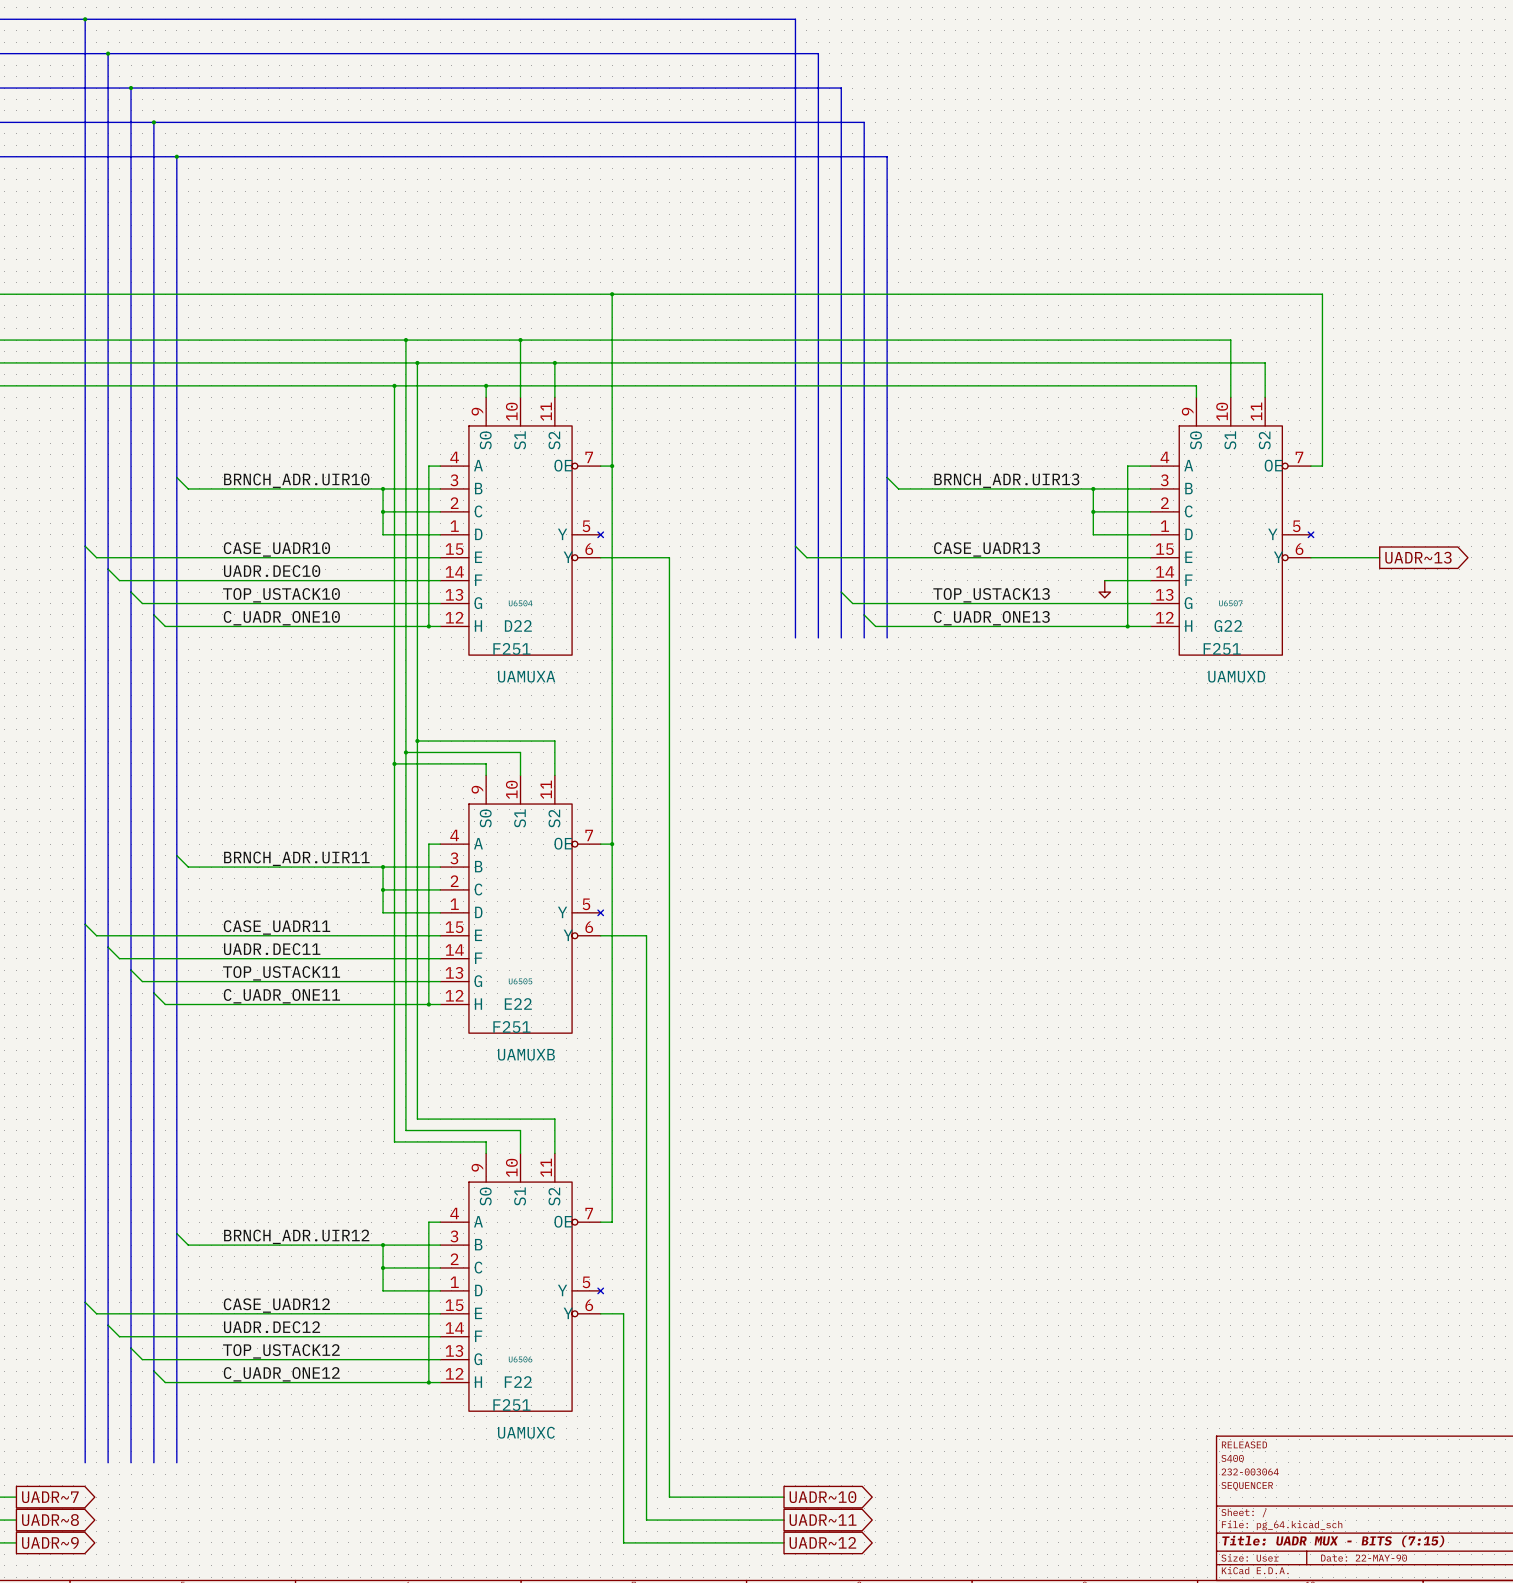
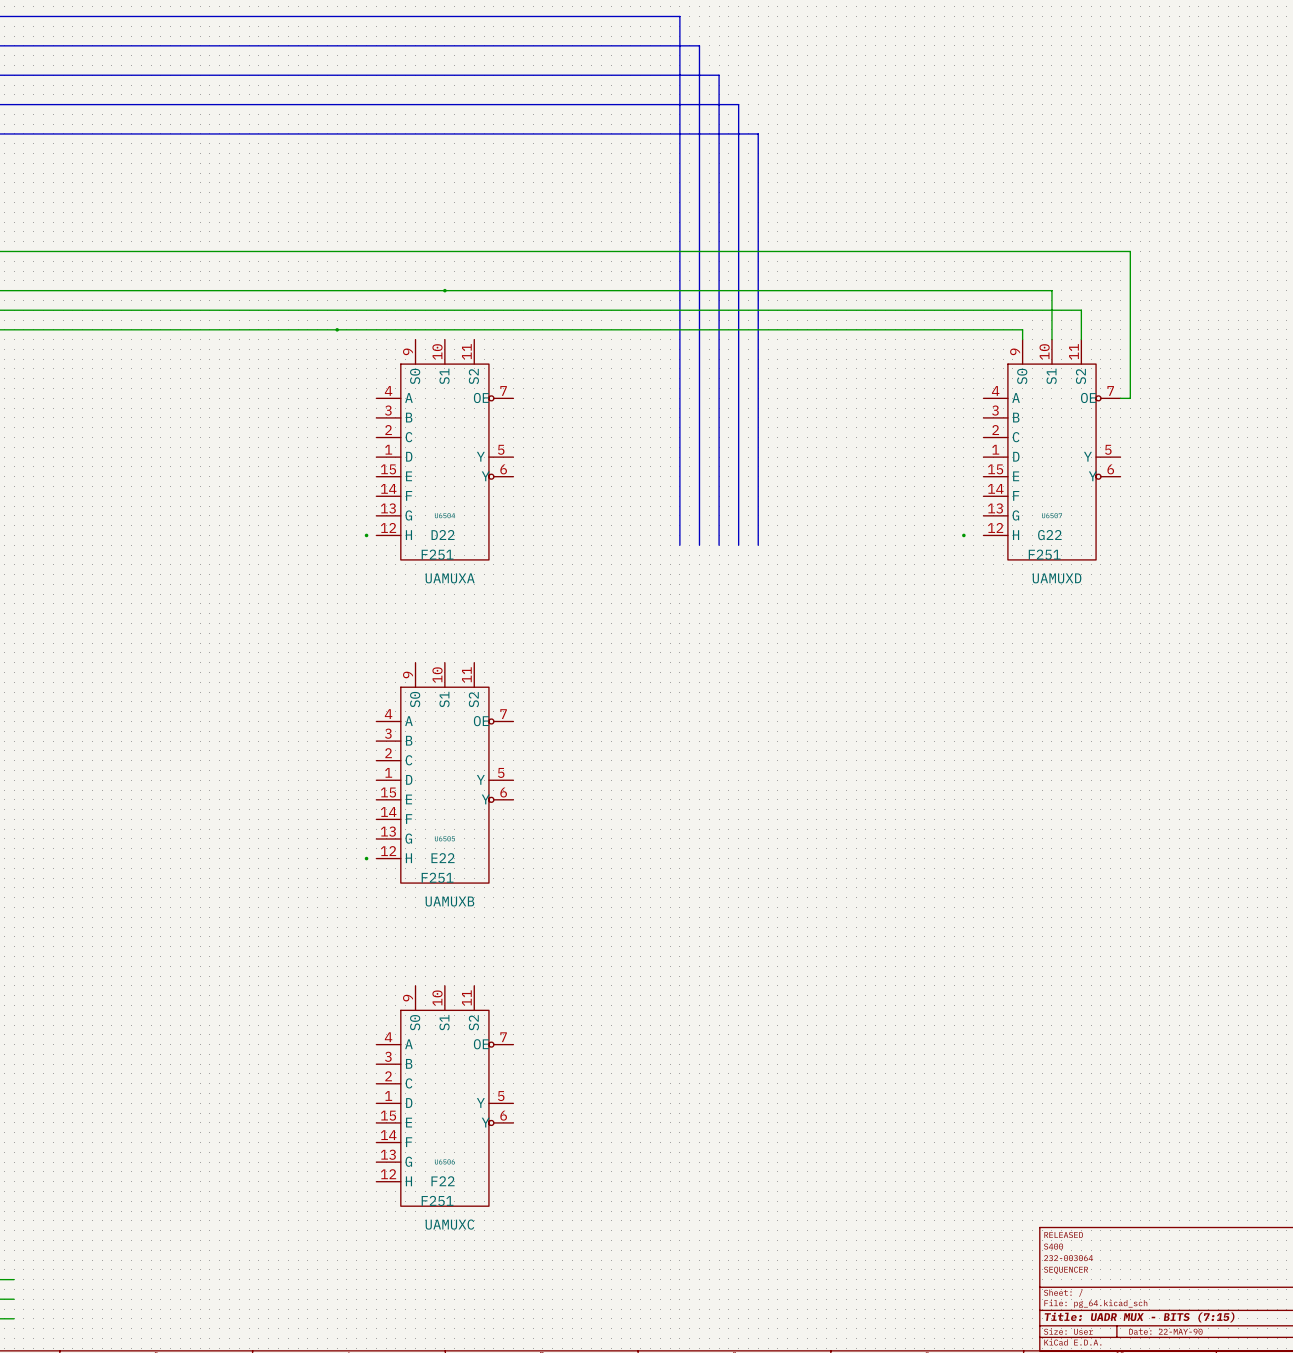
bus: (85, 19) (85, 1462) -> none
junction: (85, 19) -> none
bus: (108, 53) (108, 1462) -> none
junction: (108, 53) -> none
bus: (131, 88) (131, 1462) -> none
junction: (131, 88) -> none
bus: (153, 122) (153, 1462) -> none
junction: (153, 122) -> none
bus: (176, 156) (176, 1462) -> none
junction: (176, 156) -> none
wire: (612, 294) (612, 1222) (600, 1222) -> none
junction: (612, 294) -> none
wire: (405, 340) (405, 1130) (520, 1130) (520, 1153) -> none
junction: (405, 340) -> none
wire: (520, 340) (520, 397) -> none
wire: (417, 362) (417, 1119) (554, 1119) (554, 1153) -> none
junction: (417, 362) -> none
wire: (554, 362) (554, 397) -> none
junction: (554, 362) -> none
wire: (394, 385) (394, 1141) (486, 1141) (486, 1153) -> none
wire: (486, 385) (486, 397) -> none
junction: (486, 385) -> none
wire: (440, 466) (428, 466) (428, 626) -> none
wire: (600, 466) (612, 466) -> none
junction: (612, 466) -> none
wire: (1150, 466) (1127, 466) (1127, 626) -> none
wire: (176, 477) (188, 488) (440, 488) -> none
wire: (887, 477) (898, 488) (1150, 488) -> none
label: BRNCH_ADR.UIR10 (296, 480) -> none
label: BRNCH_ADR.UIR13 (1006, 480) -> none
wire: (383, 488) (383, 534) (440, 534) -> none
junction: (383, 488) -> none
wire: (1093, 488) (1093, 534) (1150, 534) -> none
junction: (1093, 488) -> none
wire: (383, 511) (440, 511) -> none
junction: (383, 511) -> none
wire: (1093, 511) (1150, 511) -> none
junction: (1093, 511) -> none
no-connect mark: (600, 534) -> none
no-connect mark: (1310, 534) -> none
wire: (85, 546) (96, 557) (440, 557) -> none
wire: (795, 546) (806, 557) (1150, 557) -> none
label: CASE_UADR10 (276, 549) -> none
label: CASE_UADR13 (986, 549) -> none
wire: (600, 557) (669, 557) (669, 1497) (784, 1497) -> none
wire: (1310, 557) (1379, 557) -> none
global label: UADR~13 (1418, 557) -> none
wire: (108, 569) (119, 580) (440, 580) -> none
label: UADR.DEC10 (272, 571) -> none
wire: (1104, 580) (1150, 580) -> none
power symbol: (1104, 589) -> none
wire: (131, 592) (142, 603) (440, 603) -> none
wire: (841, 592) (852, 603) (1150, 603) -> none
label: TOP_USTACK10 (281, 595) -> none
label: TOP_USTACK13 (991, 595) -> none
wire: (153, 614) (165, 626) (440, 626) -> none
wire: (864, 614) (875, 626) (1150, 626) -> none
label: C_UADR_ONE10 (281, 618) -> none
label: C_UADR_ONE13 (991, 618) -> none
wire: (417, 741) (554, 741) (554, 775) -> none
junction: (417, 741) -> none
wire: (405, 752) (520, 752) (520, 775) -> none
junction: (405, 752) -> none
wire: (394, 763) (486, 763) (486, 775) -> none
junction: (394, 763) -> none
wire: (440, 844) (428, 844) (428, 1004) -> none
wire: (600, 844) (612, 844) -> none
junction: (612, 844) -> none
wire: (176, 855) (188, 867) (440, 867) -> none
label: BRNCH_ADR.UIR11 (296, 858) -> none
wire: (383, 867) (383, 912) (440, 912) -> none
junction: (383, 867) -> none
wire: (383, 889) (440, 889) -> none
junction: (383, 889) -> none
no-connect mark: (600, 912) -> none
wire: (85, 924) (96, 935) (440, 935) -> none
label: CASE_UADR11 (277, 927) -> none
wire: (600, 935) (646, 935) (646, 1520) (784, 1520) -> none
wire: (108, 947) (119, 958) (440, 958) -> none
label: UADR.DEC11 (272, 949) -> none
wire: (131, 970) (142, 981) (440, 981) -> none
label: TOP_USTACK11 (281, 973) -> none
wire: (153, 993) (165, 1004) (440, 1004) -> none
label: C_UADR_ONE11 (281, 996) -> none
wire: (440, 1222) (428, 1222) (428, 1382) -> none
wire: (176, 1233) (188, 1245) (440, 1245) -> none
label: BRNCH_ADR.UIR12 (296, 1236) -> none
wire: (383, 1245) (383, 1290) (440, 1290) -> none
junction: (383, 1245) -> none
wire: (383, 1267) (440, 1267) -> none
junction: (383, 1267) -> none
no-connect mark: (600, 1290) -> none
wire: (85, 1302) (96, 1313) (440, 1313) -> none
label: CASE_UADR12 (276, 1305) -> none
wire: (600, 1313) (623, 1313) (623, 1542) (784, 1542) -> none
wire: (108, 1325) (119, 1336) (440, 1336) -> none
label: UADR.DEC12 (272, 1327) -> none
wire: (131, 1348) (142, 1359) (440, 1359) -> none
label: TOP_USTACK12 (281, 1351) -> none
wire: (153, 1371) (165, 1382) (440, 1382) -> none
label: C_UADR_ONE12 (281, 1374) -> none
junction: (428, 1382) -> none
global label: UADR~7 (50, 1497) -> none
global label: UADR~10 (822, 1497) -> none
global label: UADR~8 (50, 1520) -> none
global label: UADR~11 (823, 1520) -> none
global label: UADR~9 (50, 1542) -> none
global label: UADR~12 (822, 1542) -> none

